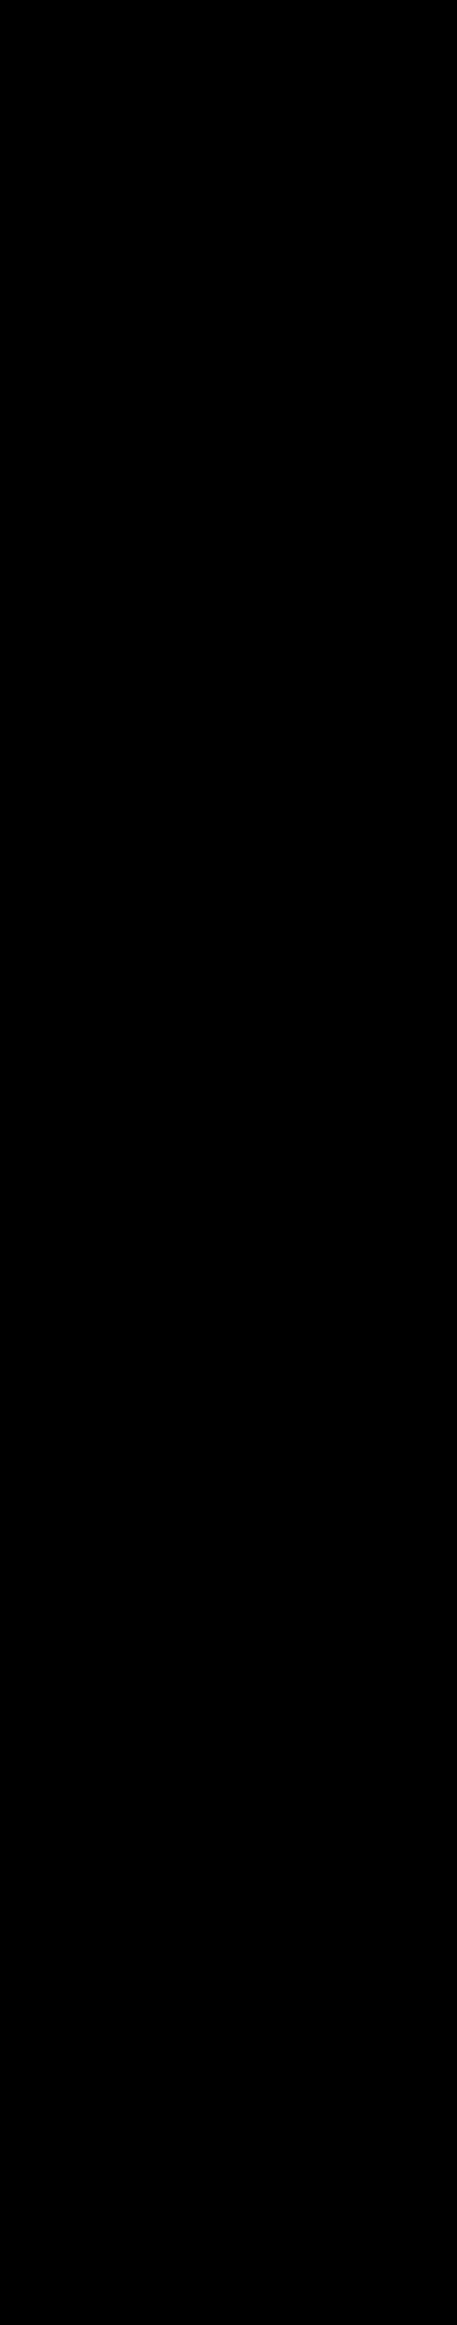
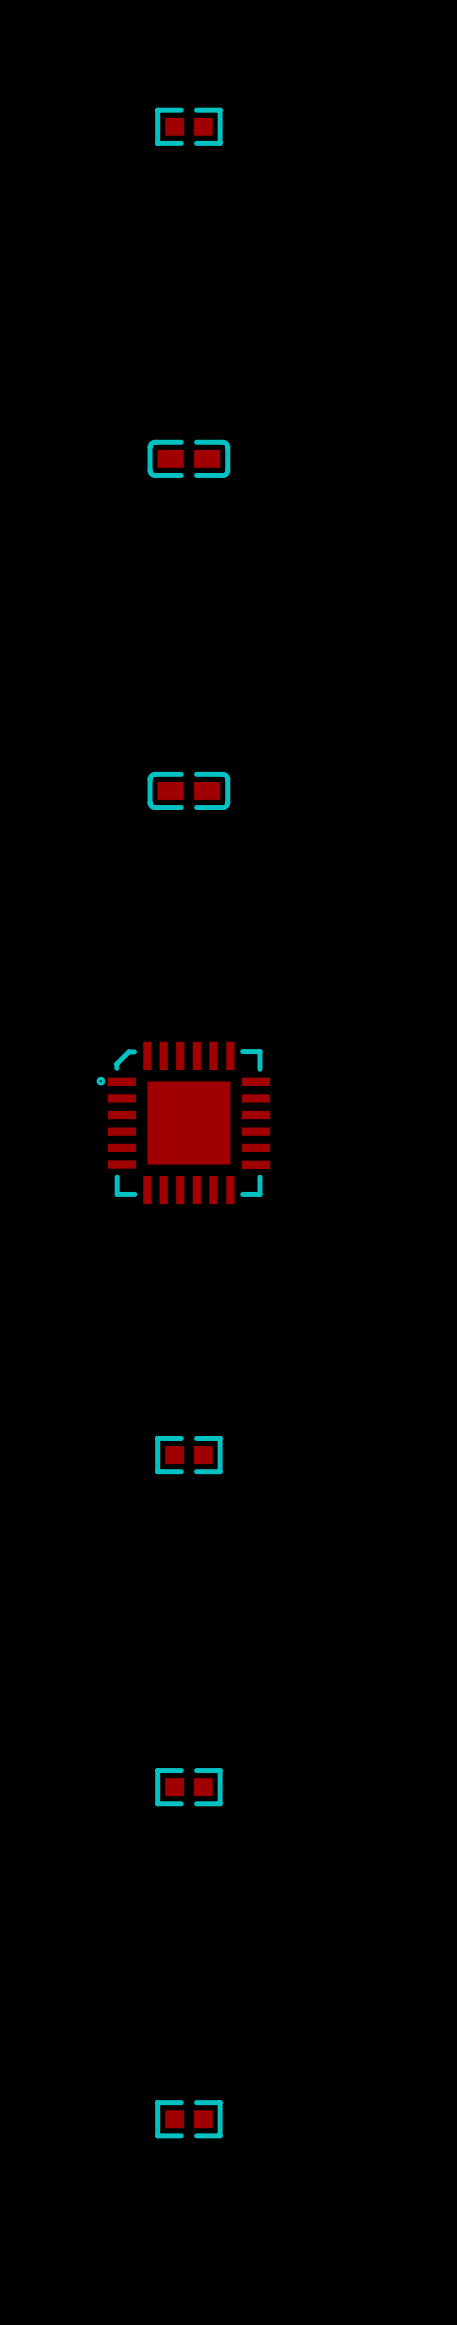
part: none -> (188, 126)
part: none -> (188, 458)
part: none -> (188, 790)
part: none -> (183, 1123)
part: none -> (188, 1455)
part: none -> (188, 1787)
part: none -> (188, 2119)

